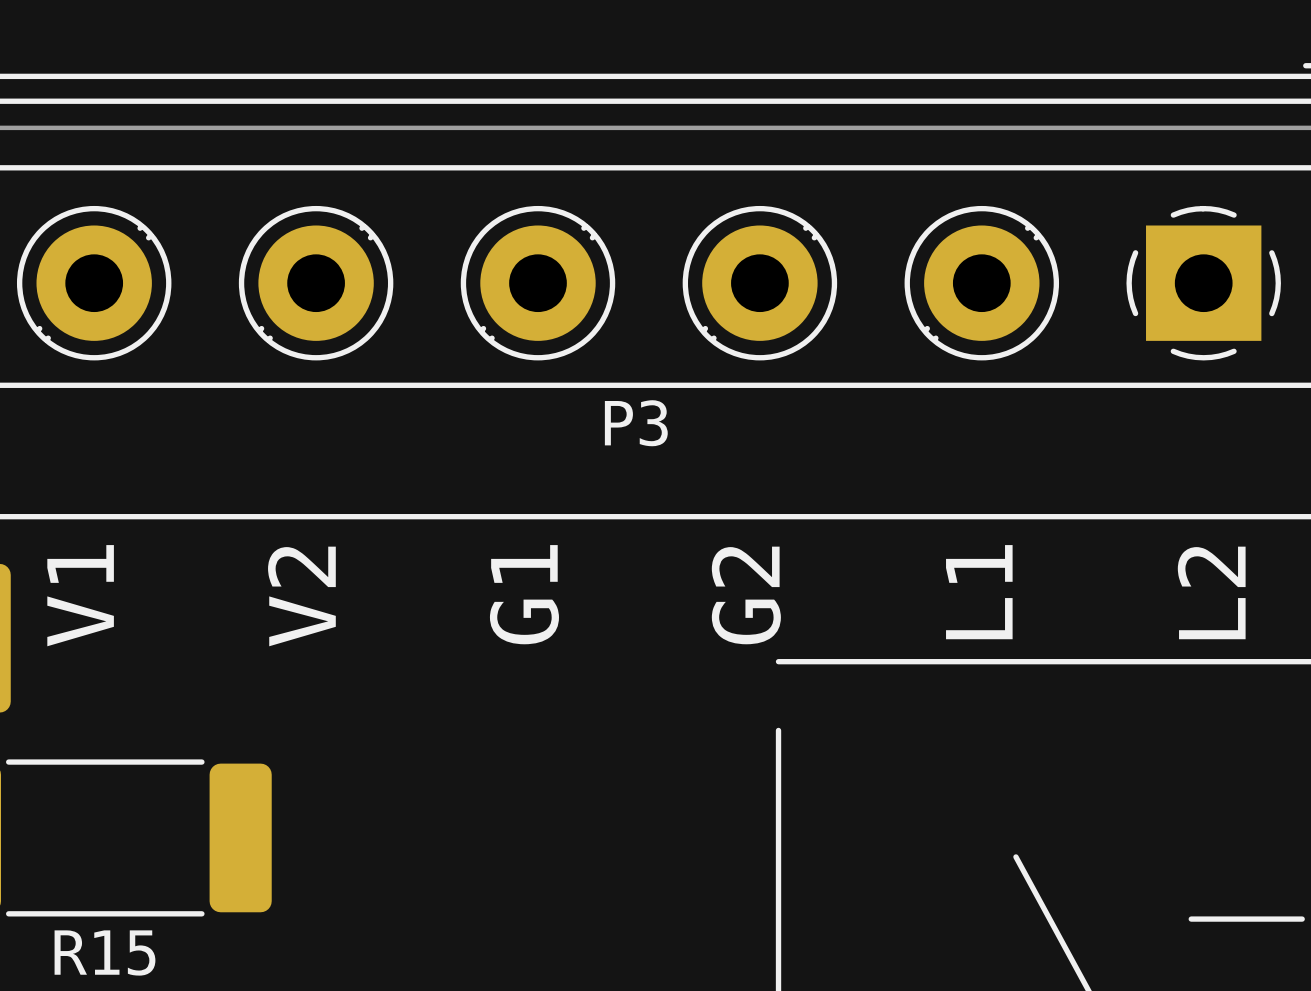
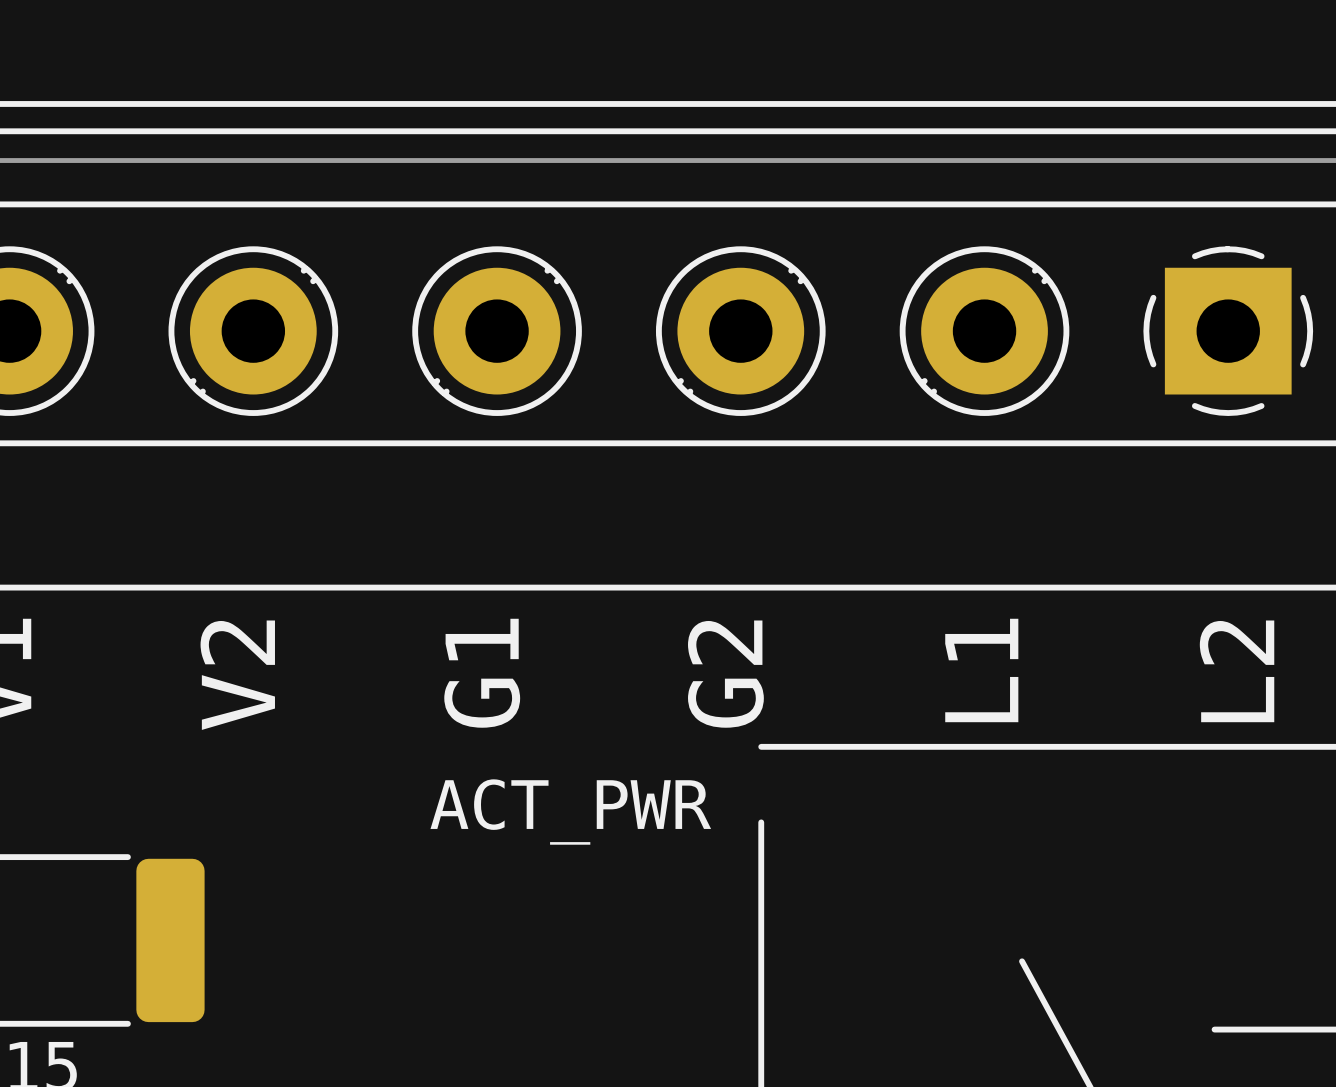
P3 name: P3 (636, 423) -> ACT_PWR (570, 812)

